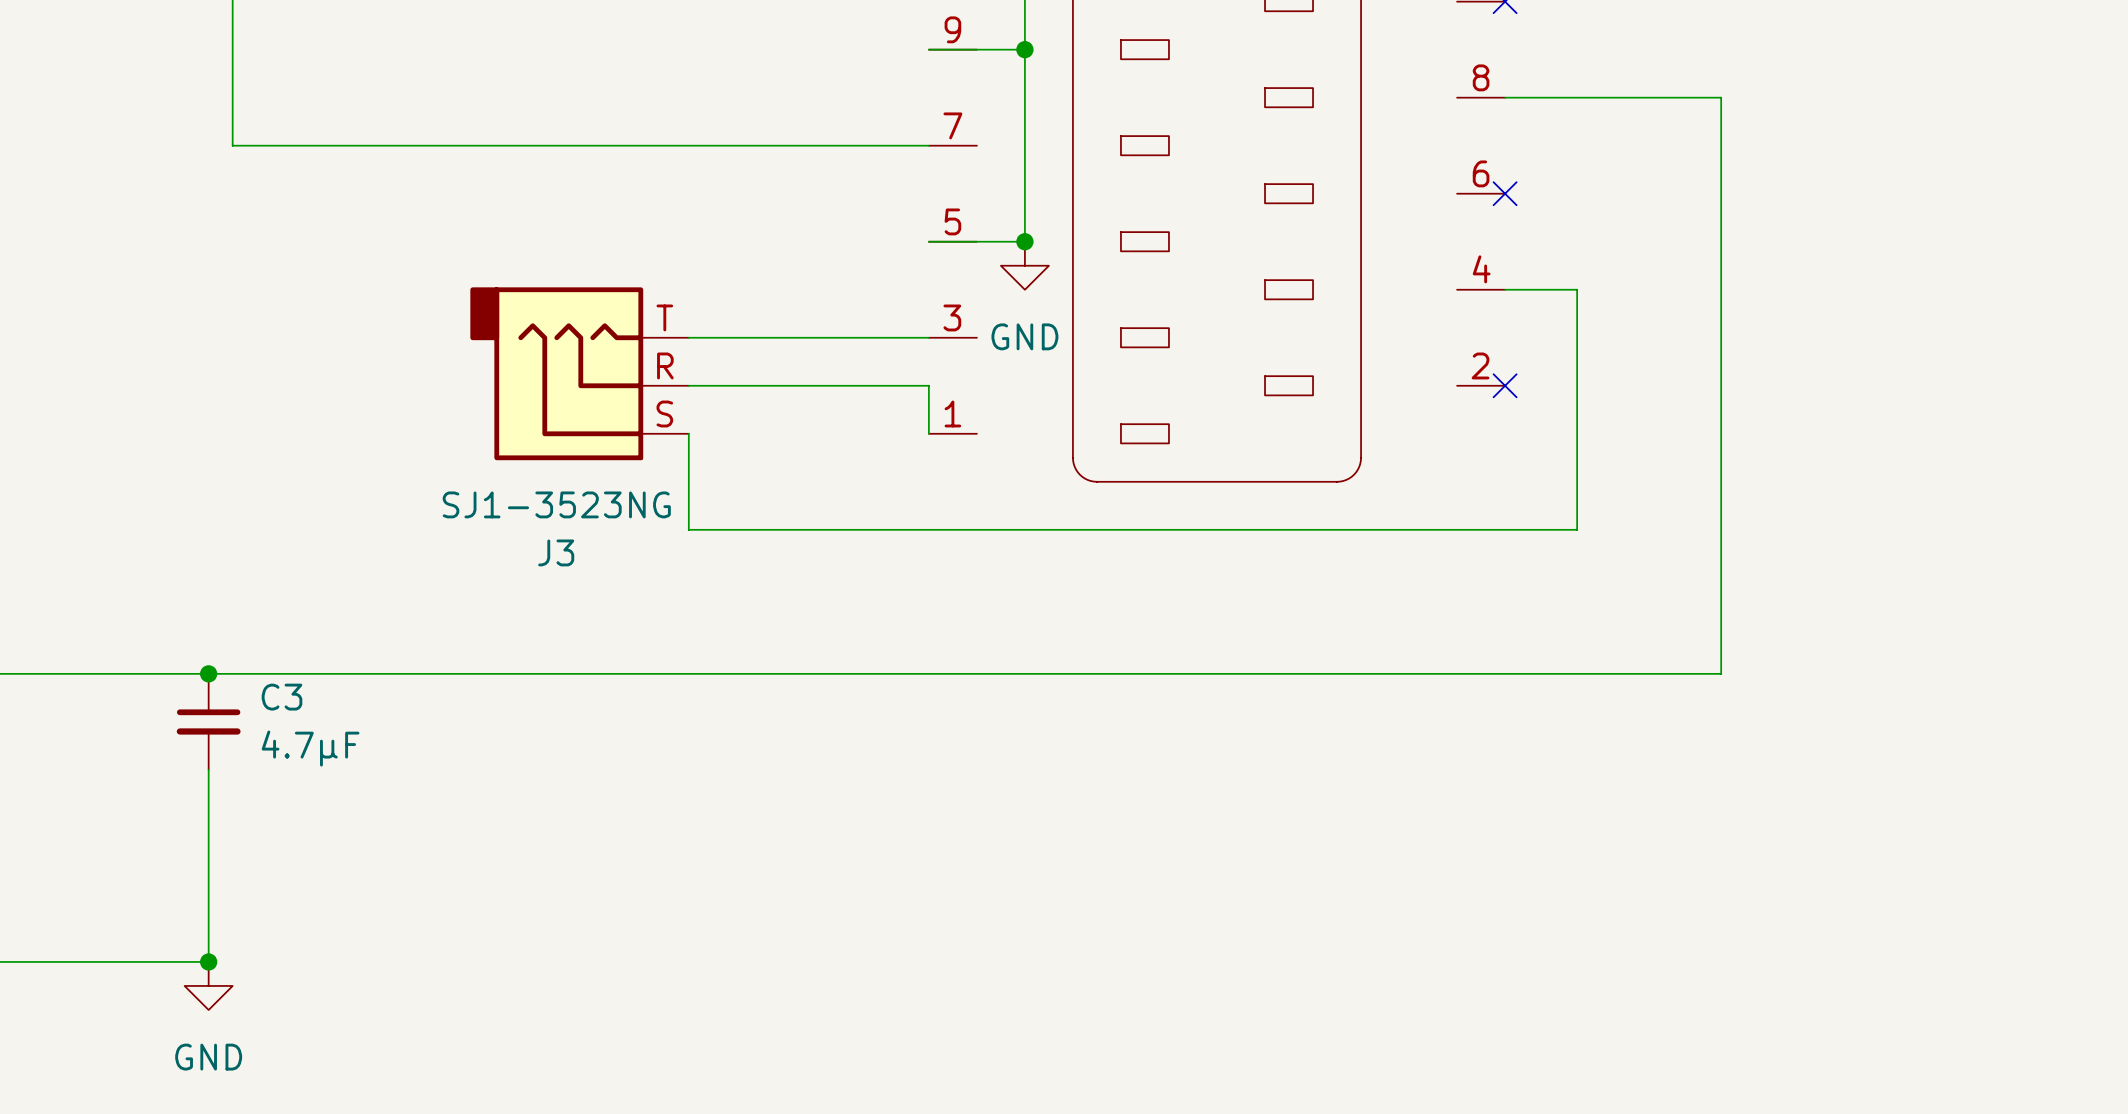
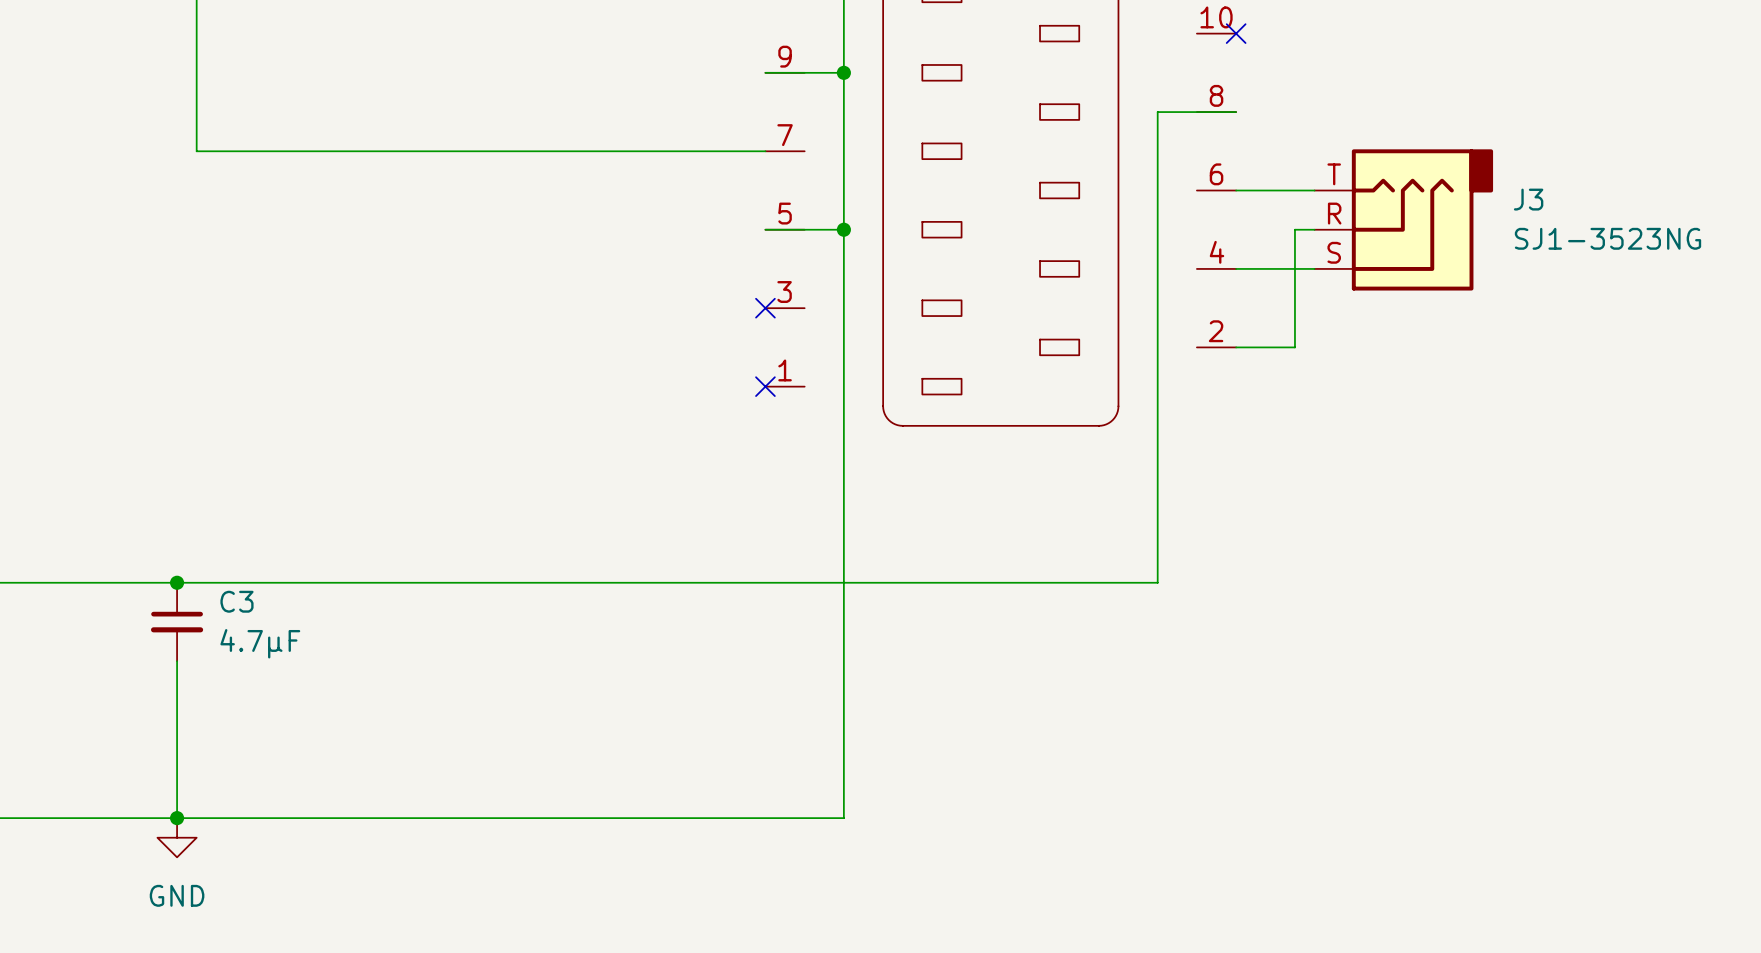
wire: (1505, 97) (1721, 97) (1721, 673) (1409, 673) -> (1236, 112) (1157, 112) (1157, 582)
wire: none -> (1236, 190) (1314, 190)
no-connect mark: (1505, 193) -> none
wire: none -> (843, 229) (843, 818) (177, 818)
wire: none -> (1314, 229) (1294, 229) (1294, 268) (1314, 268)
power symbol: GND (1024, 265) -> none
wire: (688, 337) (928, 337) -> none
no-connect mark: none -> (765, 308)
J3 flip: as is (556, 373) -> left-right (1422, 219)
J3 position: (579, 373) -> (1403, 219)
wire: (688, 385) (928, 385) (928, 433) -> none
no-connect mark: (1505, 385) -> none
wire: (1577, 385) (1577, 529) (688, 529) (688, 433) -> (1294, 347) (1236, 347)
no-connect mark: none -> (765, 386)
J3 value position: SJ1-3523NG (556, 504) -> SJ1-3523NG (1607, 238)
J3 name position: J3 (556, 552) -> J3 (1528, 199)

